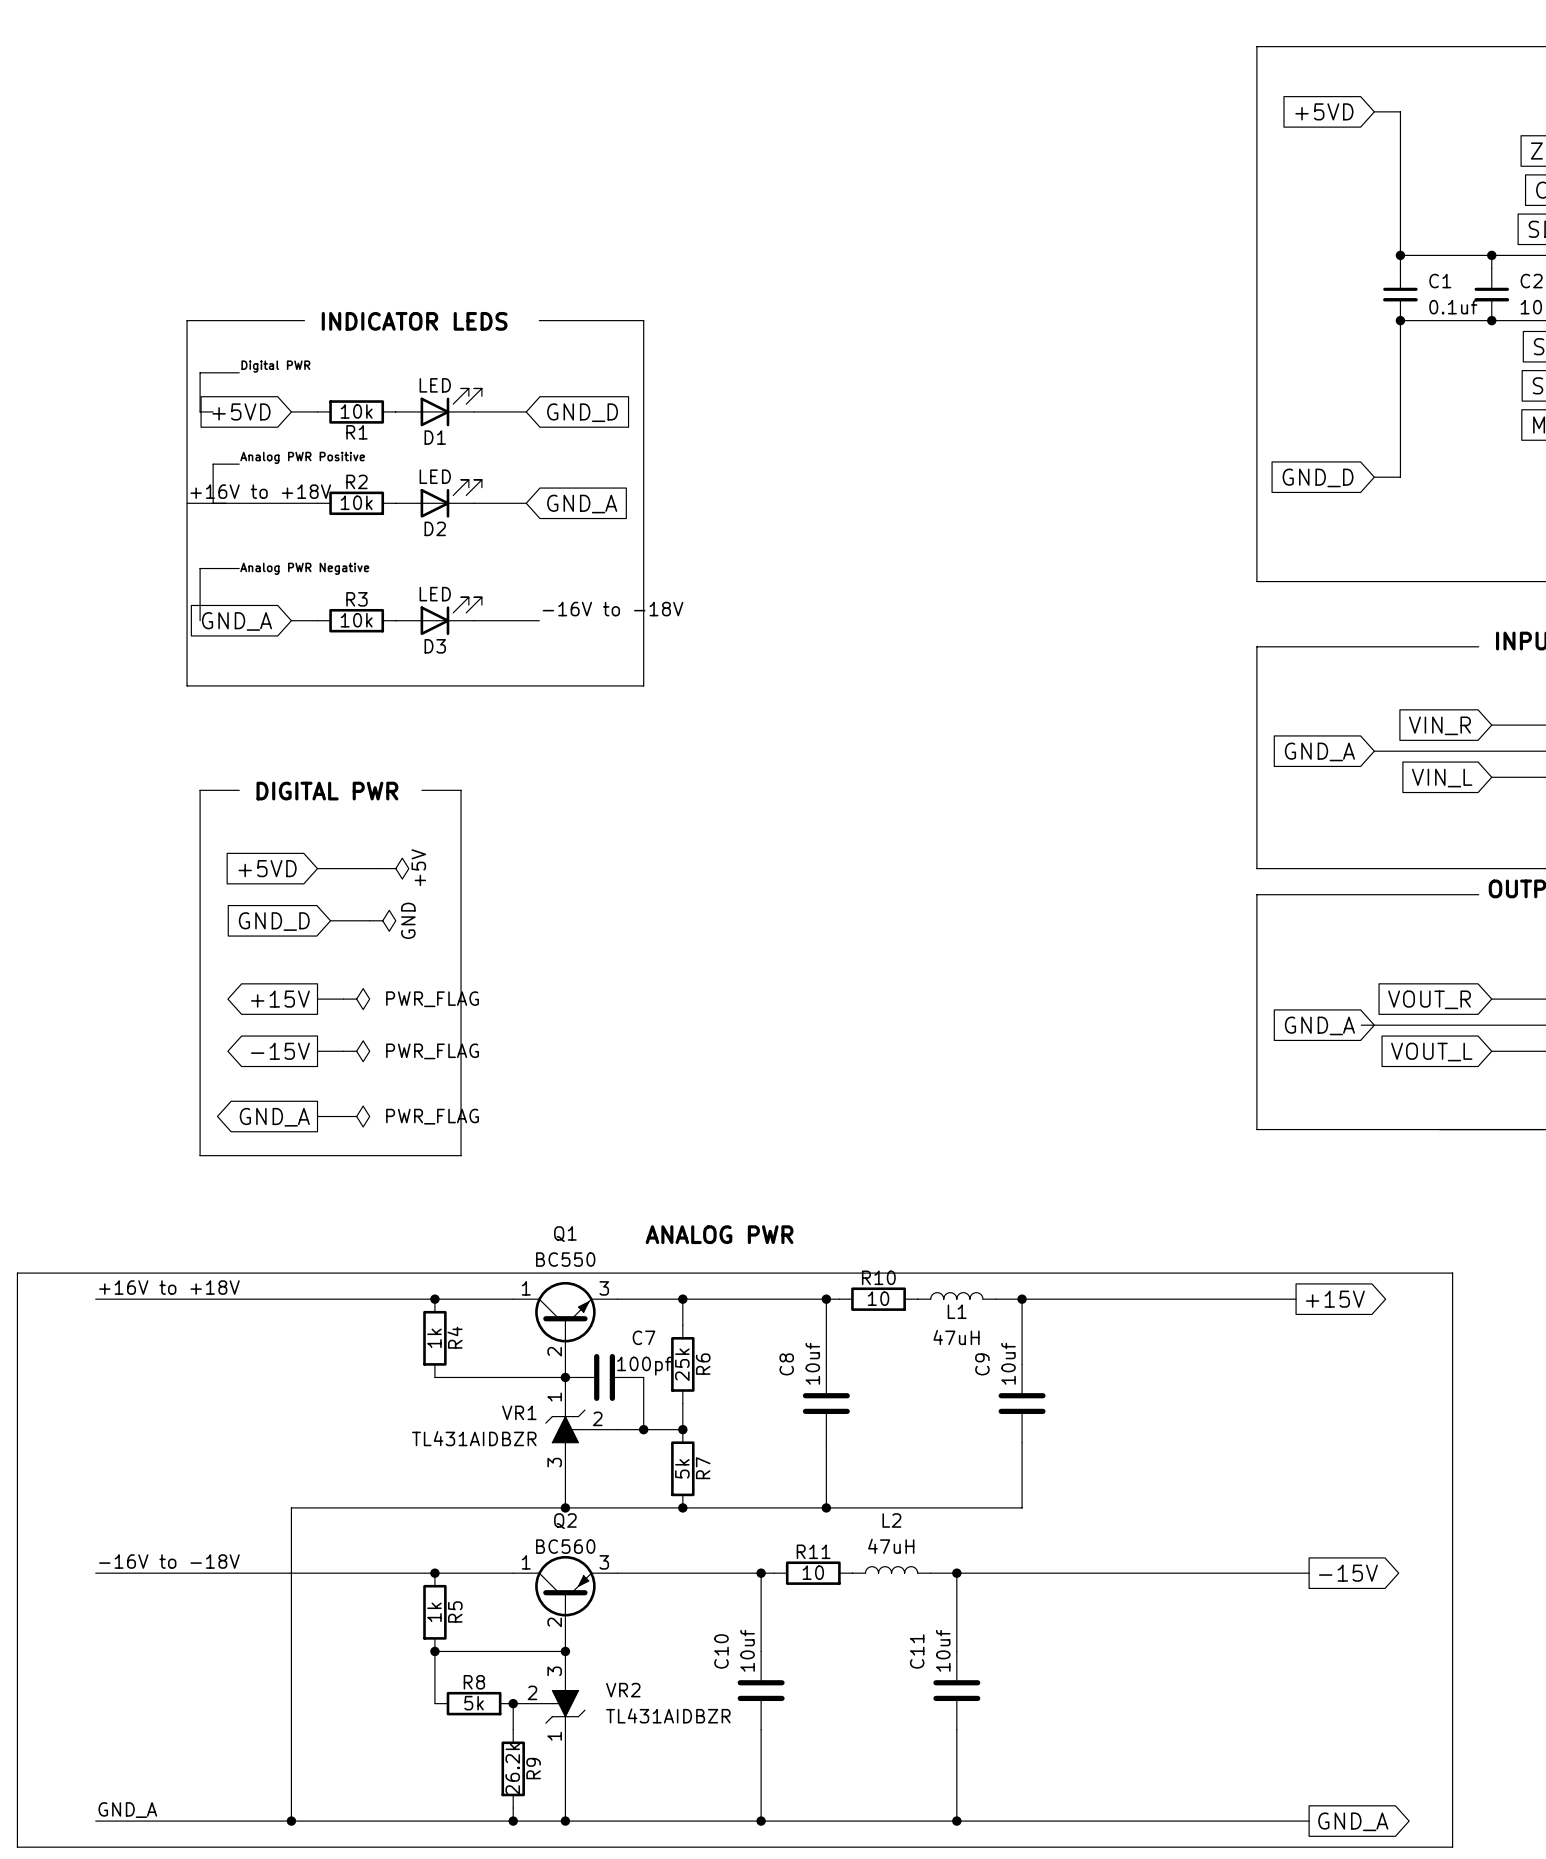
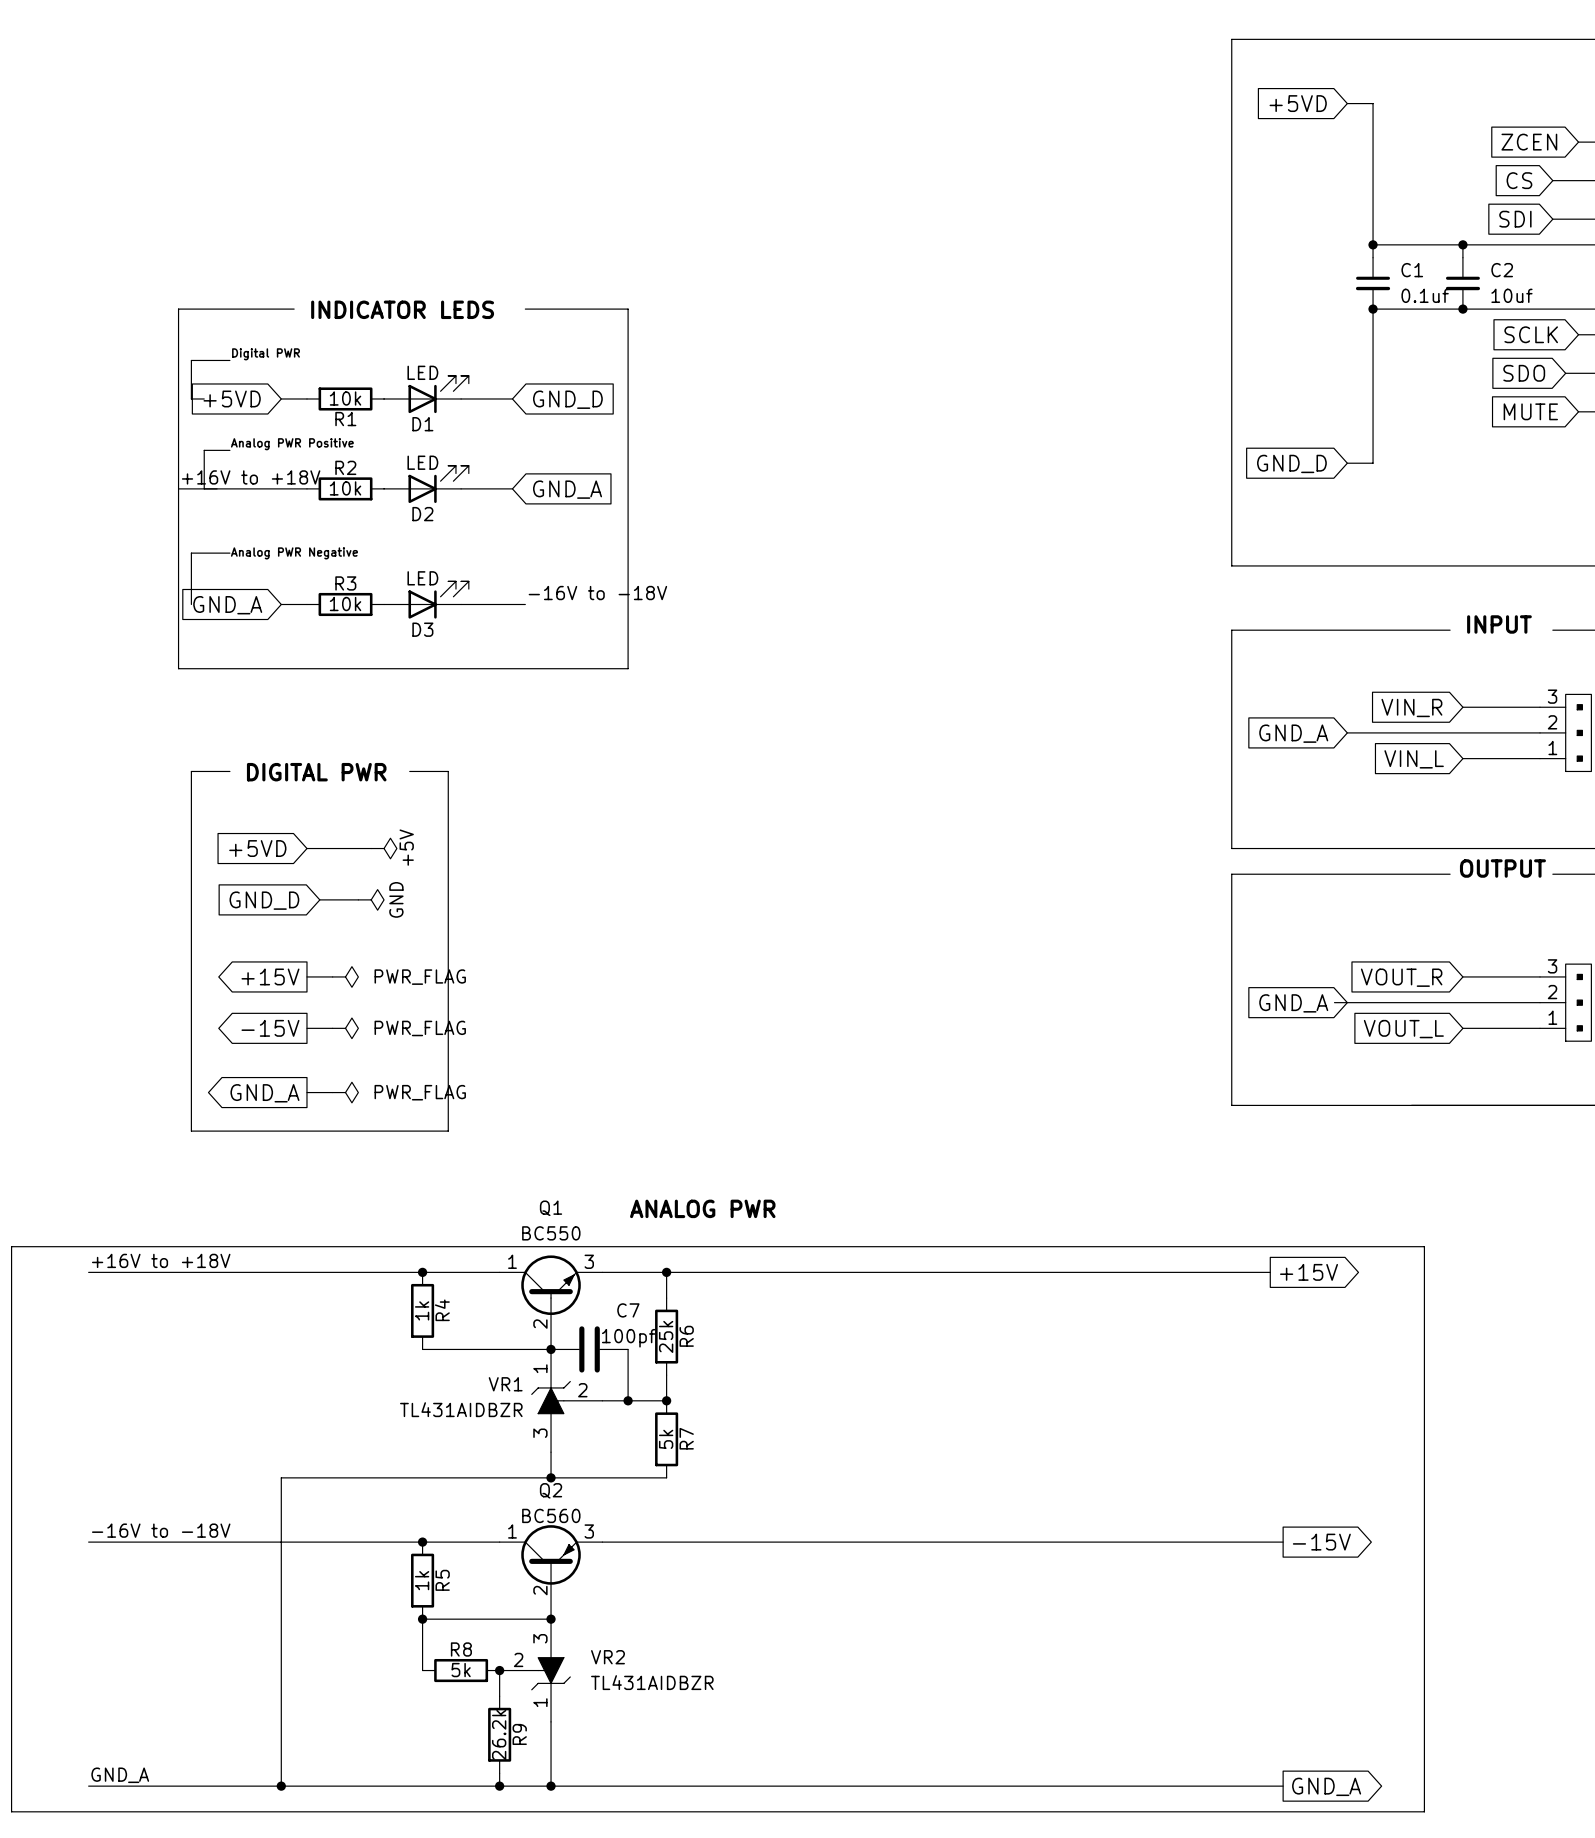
L1: 47uH (956, 1295) -> none
wire: (826, 1299) (826, 1364) -> none
junction: (826, 1299) -> none
wire: none -> (820, 1272) (974, 1272)
R10: 10 (878, 1299) -> none
wire: (1022, 1299) (1022, 1364) -> none
junction: (1022, 1299) -> none
C8: 10uf (826, 1403) -> none
C9: 10uf (1022, 1403) -> none
wire: (826, 1442) (826, 1507) -> none
wire: (1022, 1442) (1022, 1507) (682, 1507) -> none
junction: (682, 1507) -> none
junction: (826, 1507) -> none
L2: 47uH (891, 1569) -> none
wire: (761, 1573) (761, 1651) -> none
junction: (761, 1573) -> none
wire: none -> (756, 1542) (910, 1542)
R11: 10 (813, 1573) -> none
wire: (956, 1573) (956, 1651) -> none
junction: (956, 1573) -> none
C10: 10uf (761, 1690) -> none
C11: 10uf (956, 1690) -> none
wire: (761, 1729) (761, 1821) -> none
wire: (956, 1729) (956, 1821) -> none
junction: (761, 1821) -> none
junction: (956, 1821) -> none

